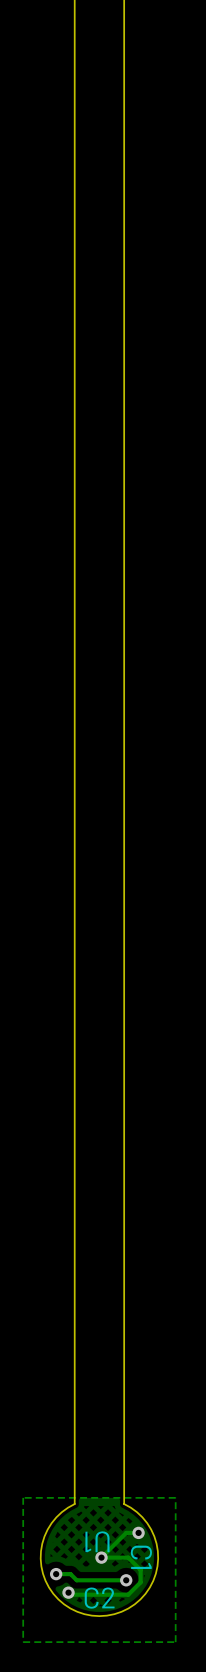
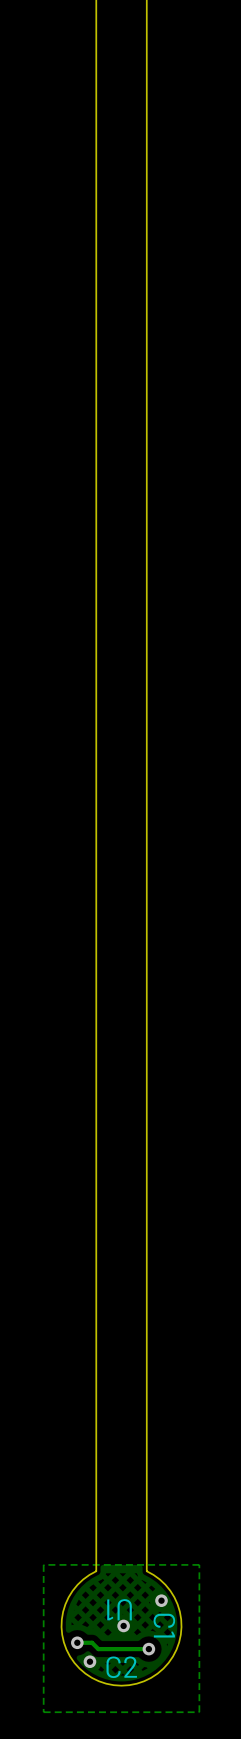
track: (138, 1532) (126, 1532) (101, 1557) (128, 1557) (140, 1569) (140, 1582) (128, 1594) (70, 1594) -> none

